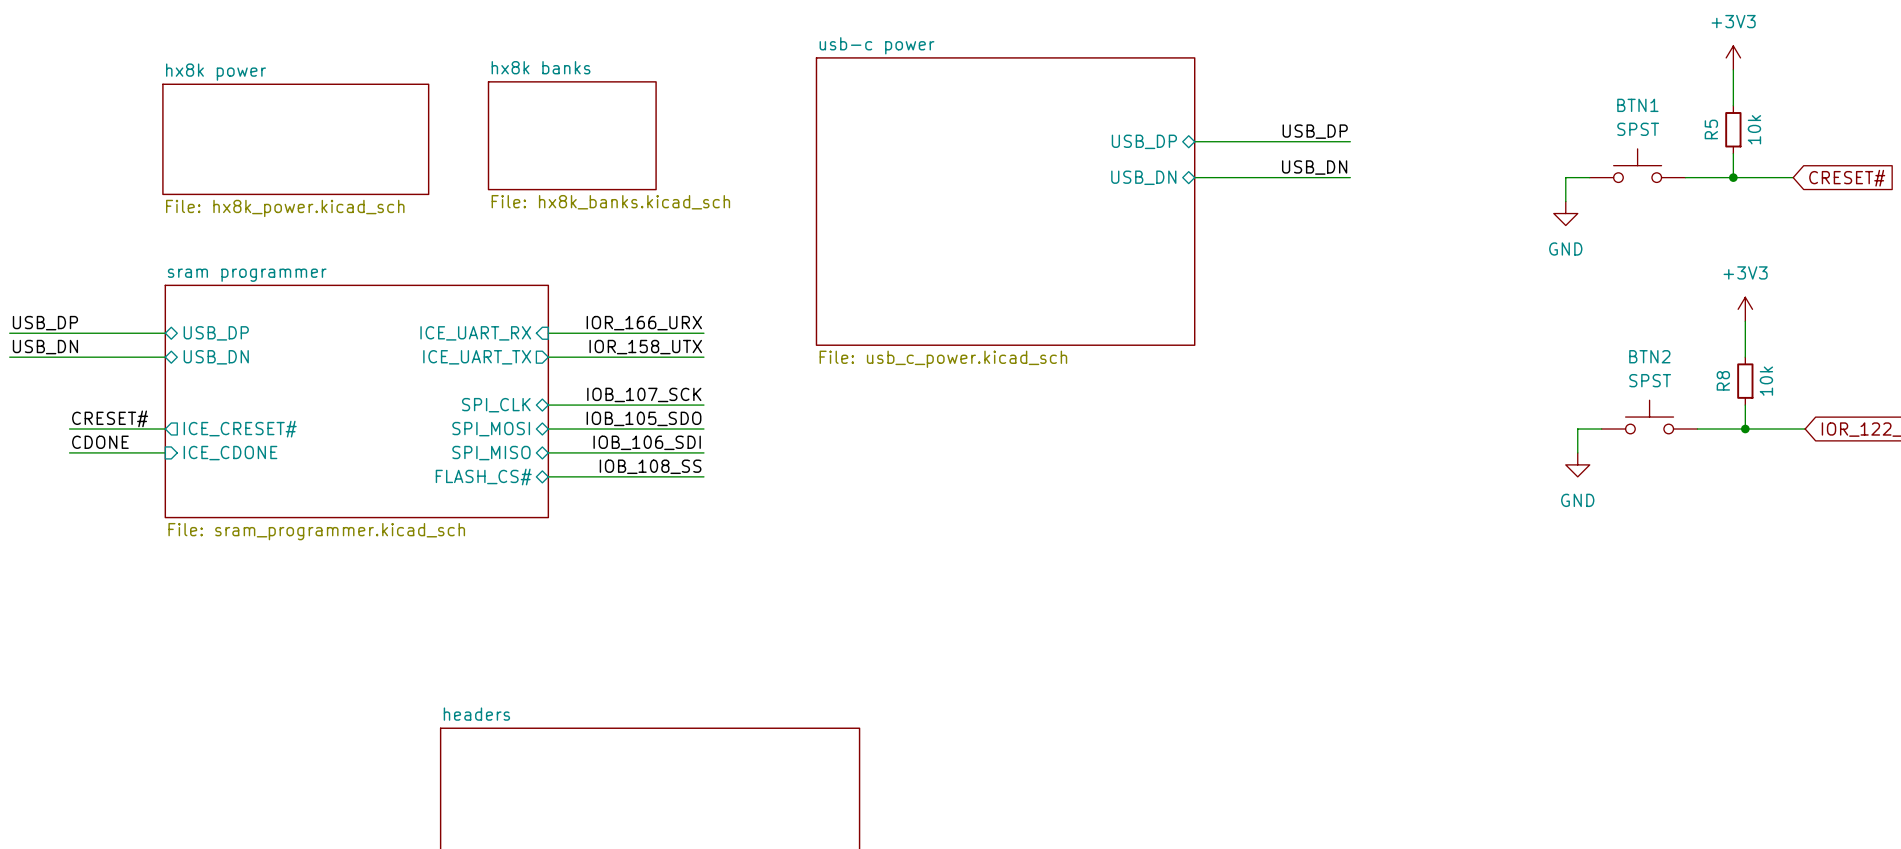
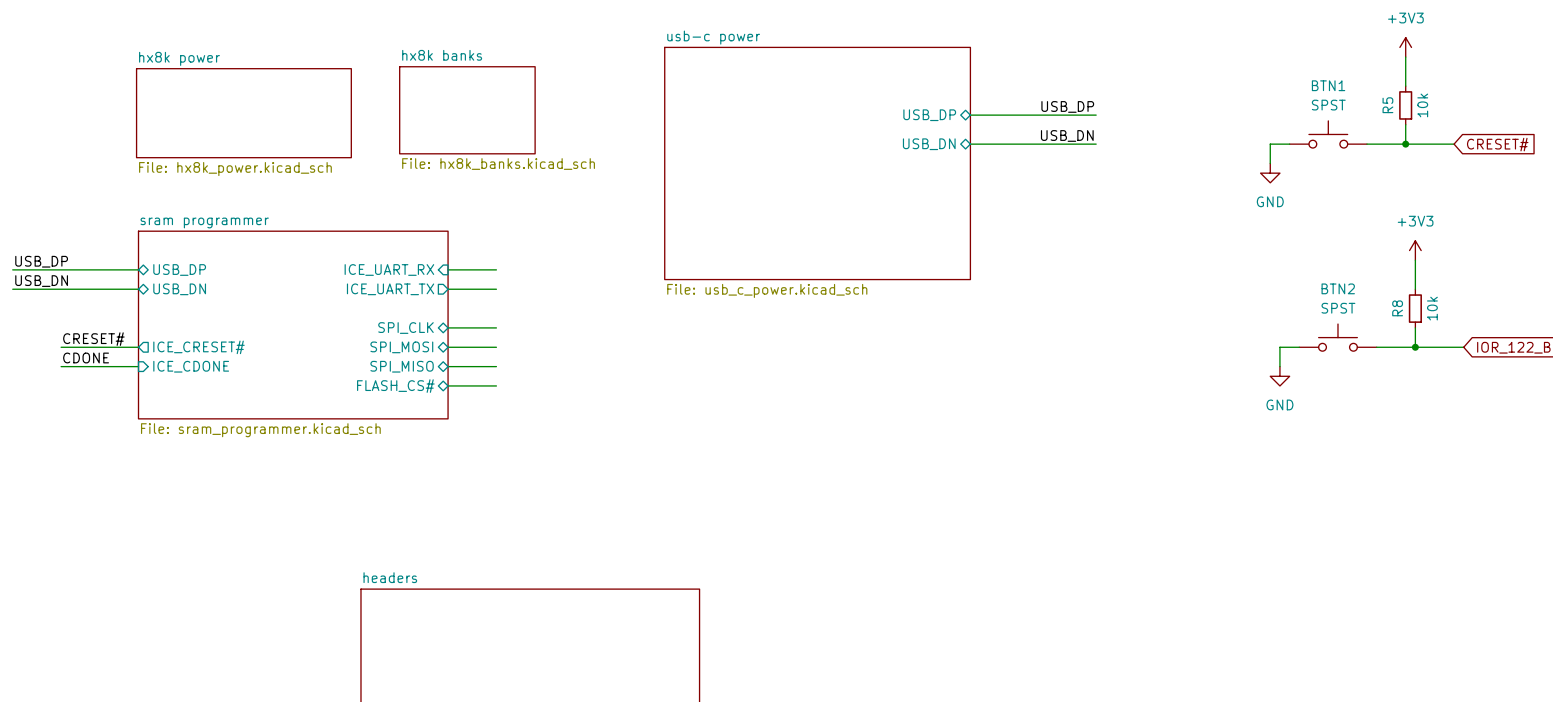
label: IOR_166_URX (644, 323) -> none
wire: (608, 333) (703, 333) -> none
label: IOR_158_UTX (645, 347) -> none
wire: (608, 357) (703, 357) -> none
label: IOB_107_SCK (644, 394) -> none
wire: (608, 405) (703, 405) -> none
label: IOB_105_SDO (644, 418) -> none
wire: (608, 429) (703, 429) -> none
label: IOB_106_SDI (647, 442) -> none
wire: (608, 452) (703, 452) -> none
label: IOB_108_SS (650, 466) -> none
wire: (608, 476) (703, 476) -> none

